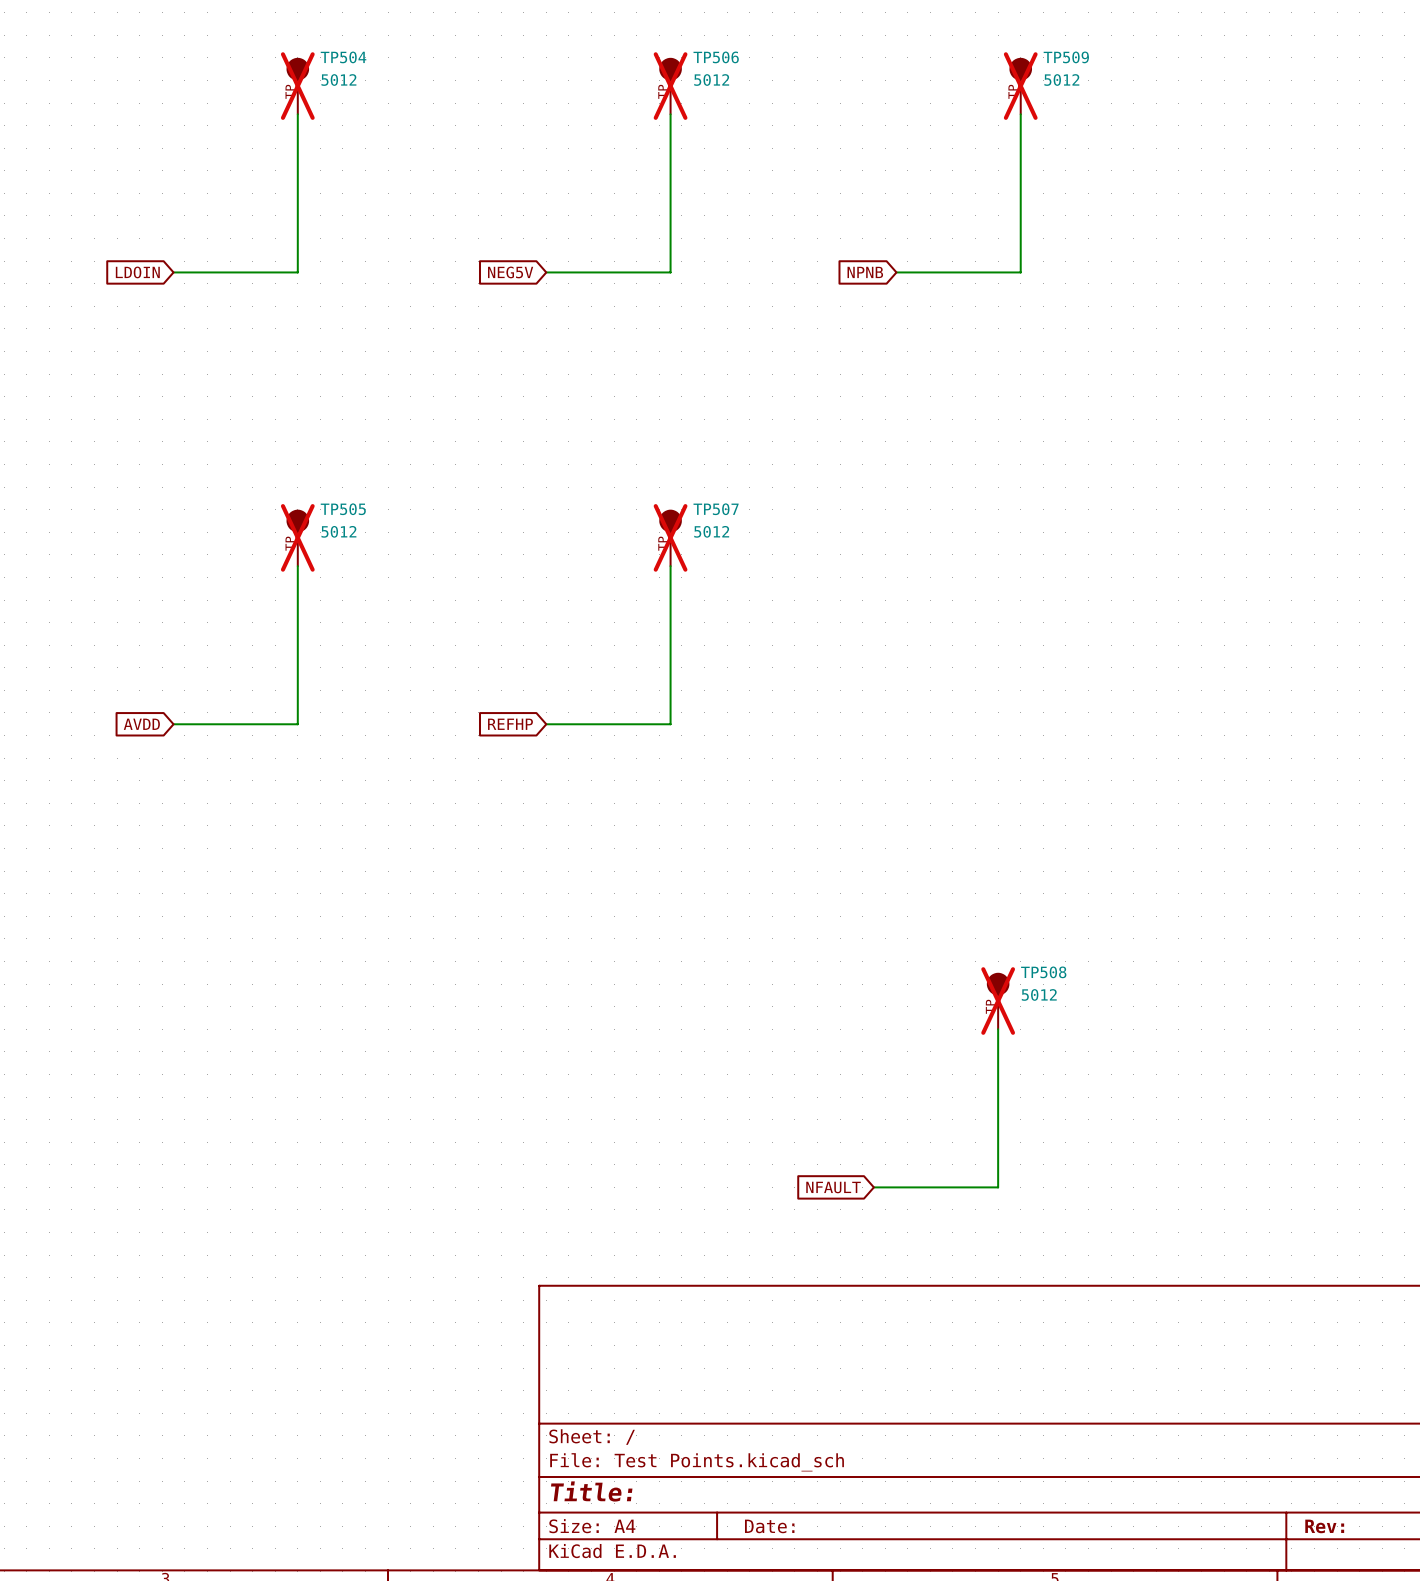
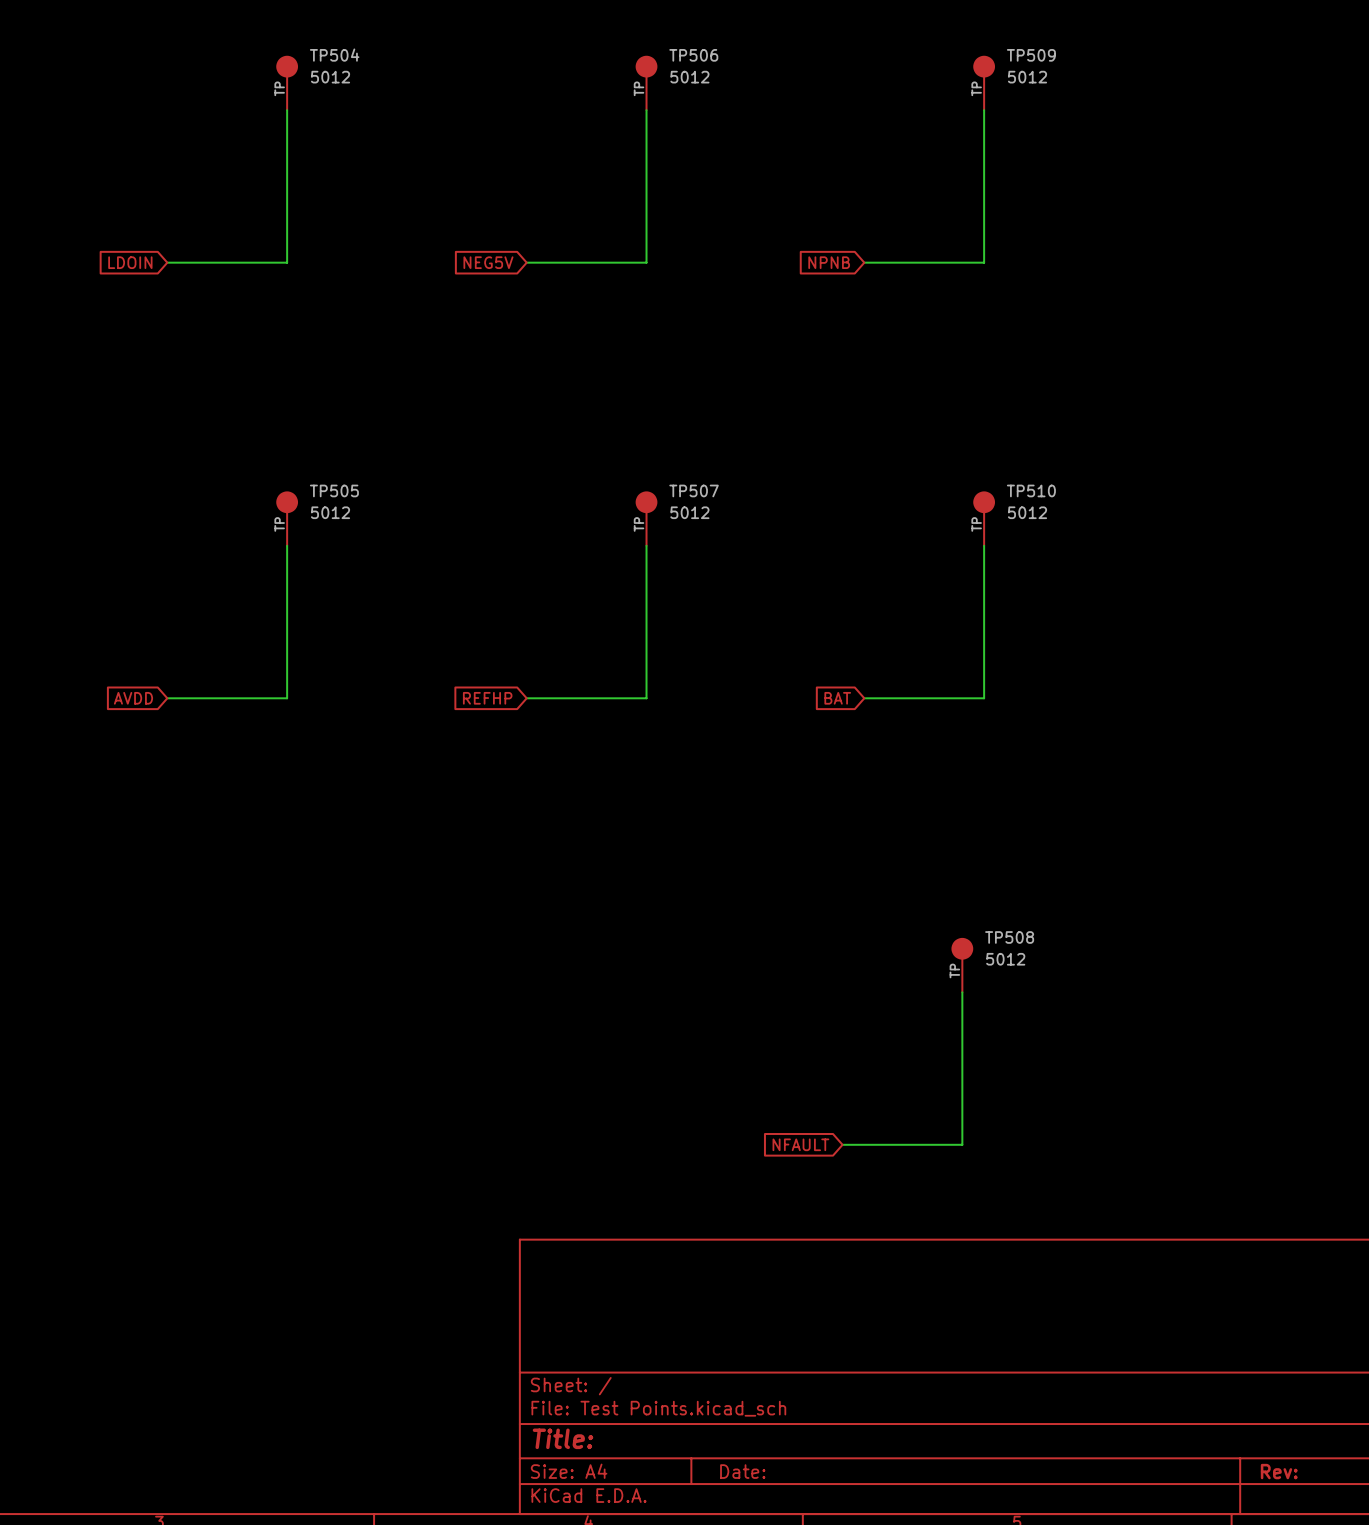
TP504 do-not-place cross: (297, 86) -> none
TP506 do-not-place cross: (670, 86) -> none
TP509 do-not-place cross: (1020, 86) -> none
TP505 do-not-place cross: (297, 537) -> none
TP507 do-not-place cross: (670, 537) -> none
TP510: none -> 5012 (984, 518)
wire: none -> (984, 545) (984, 698) (864, 698)
global label: none -> BAT (837, 698)
TP508 do-not-place cross: (998, 1001) -> none

